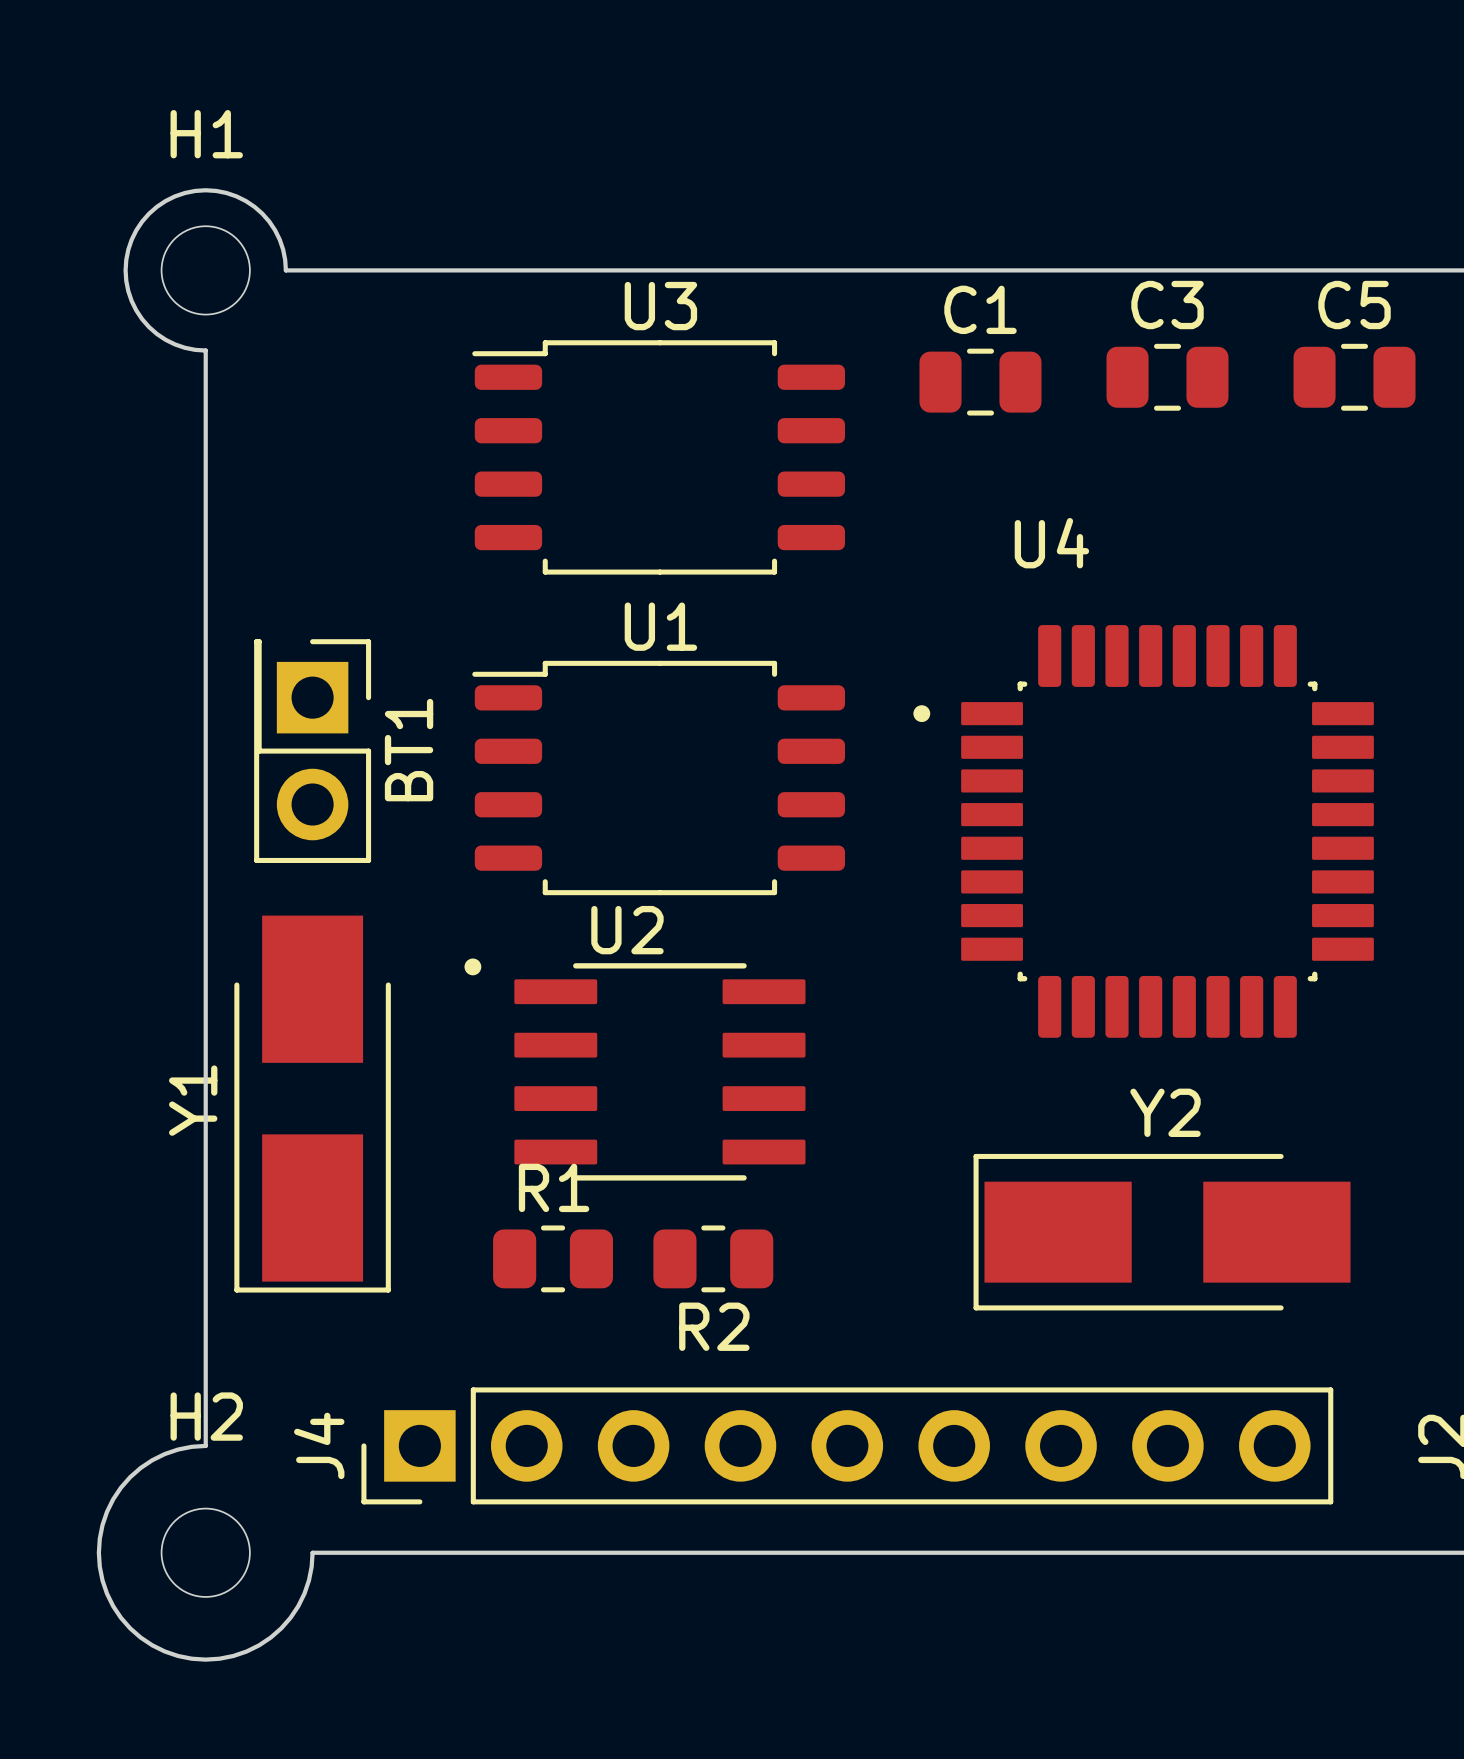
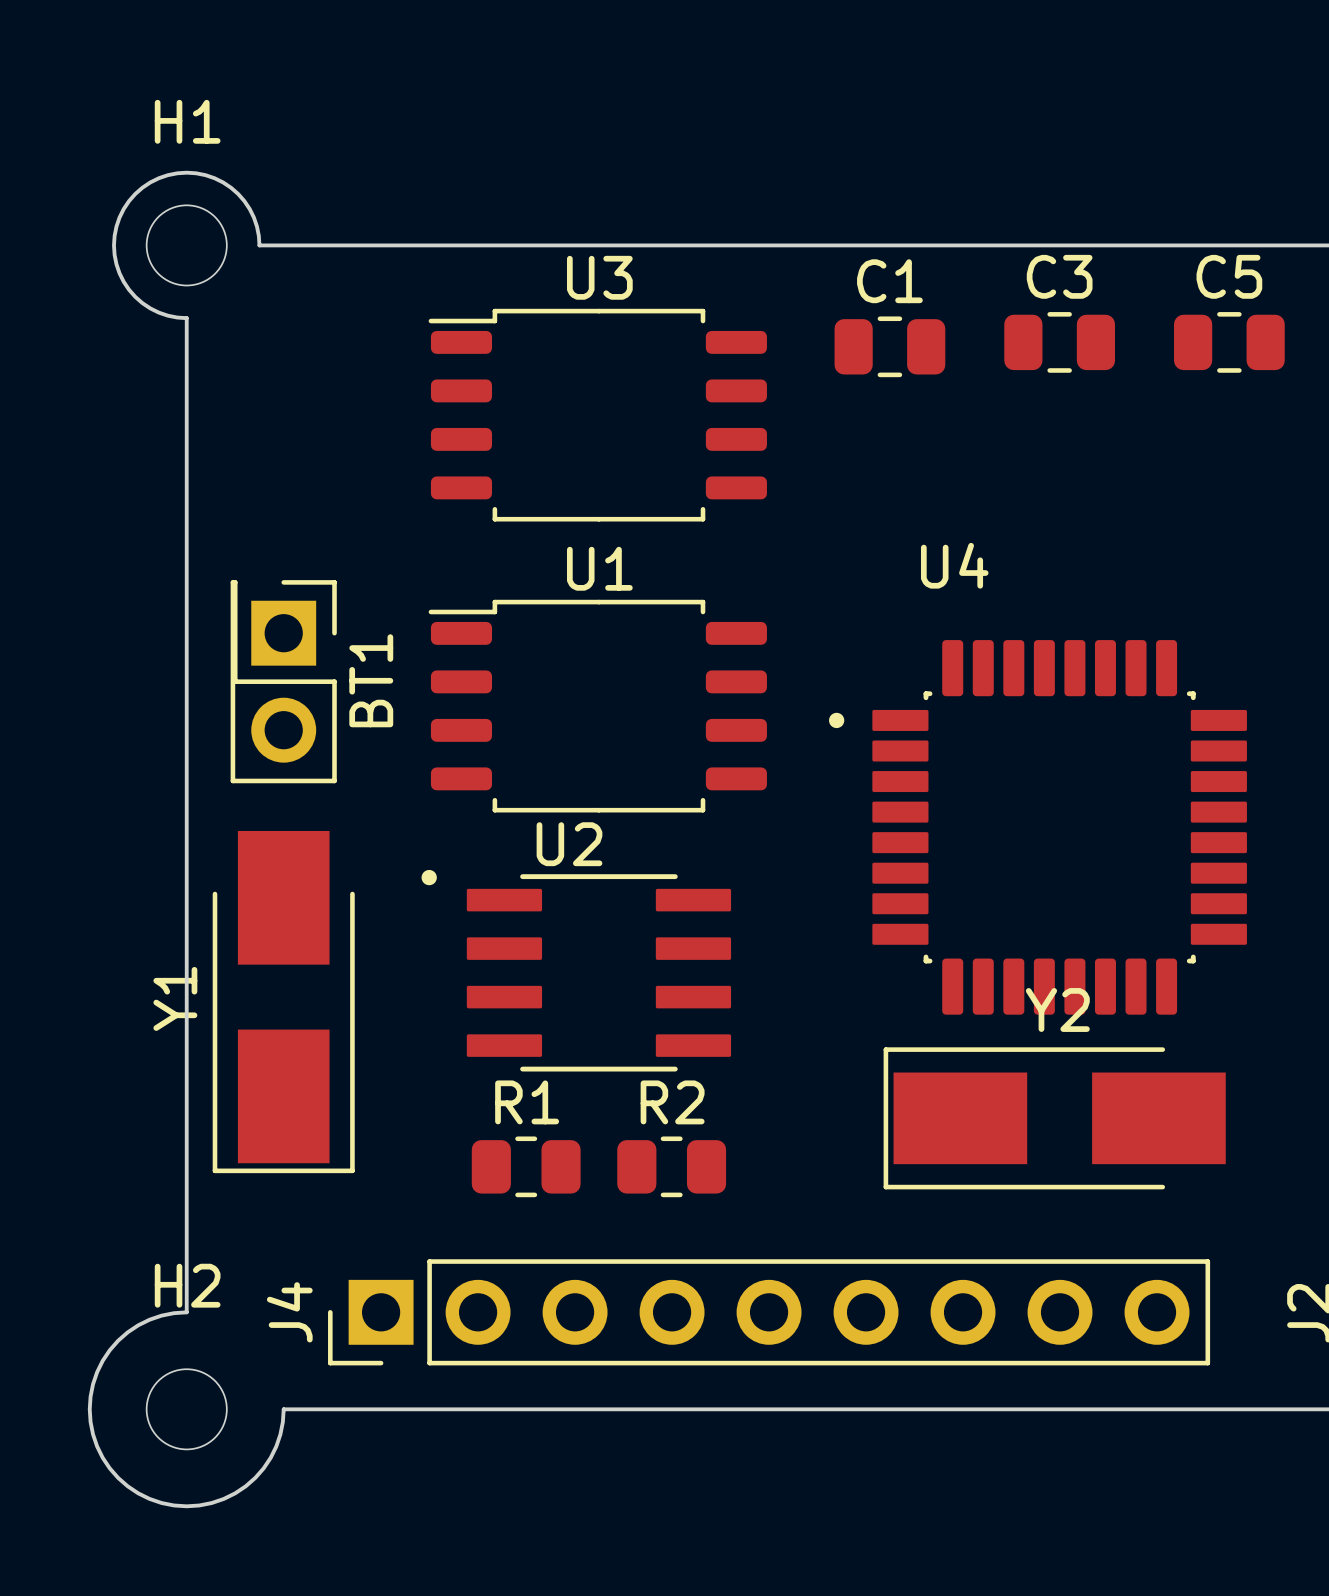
U4 position: (1143, 831) -> (1037, 827)
R1 position: (553, 1258) -> (526, 1166)
R2 position: (713, 1258) -> (671, 1166)
R2 name position: R2 (714, 1326) -> R2 (672, 1102)

